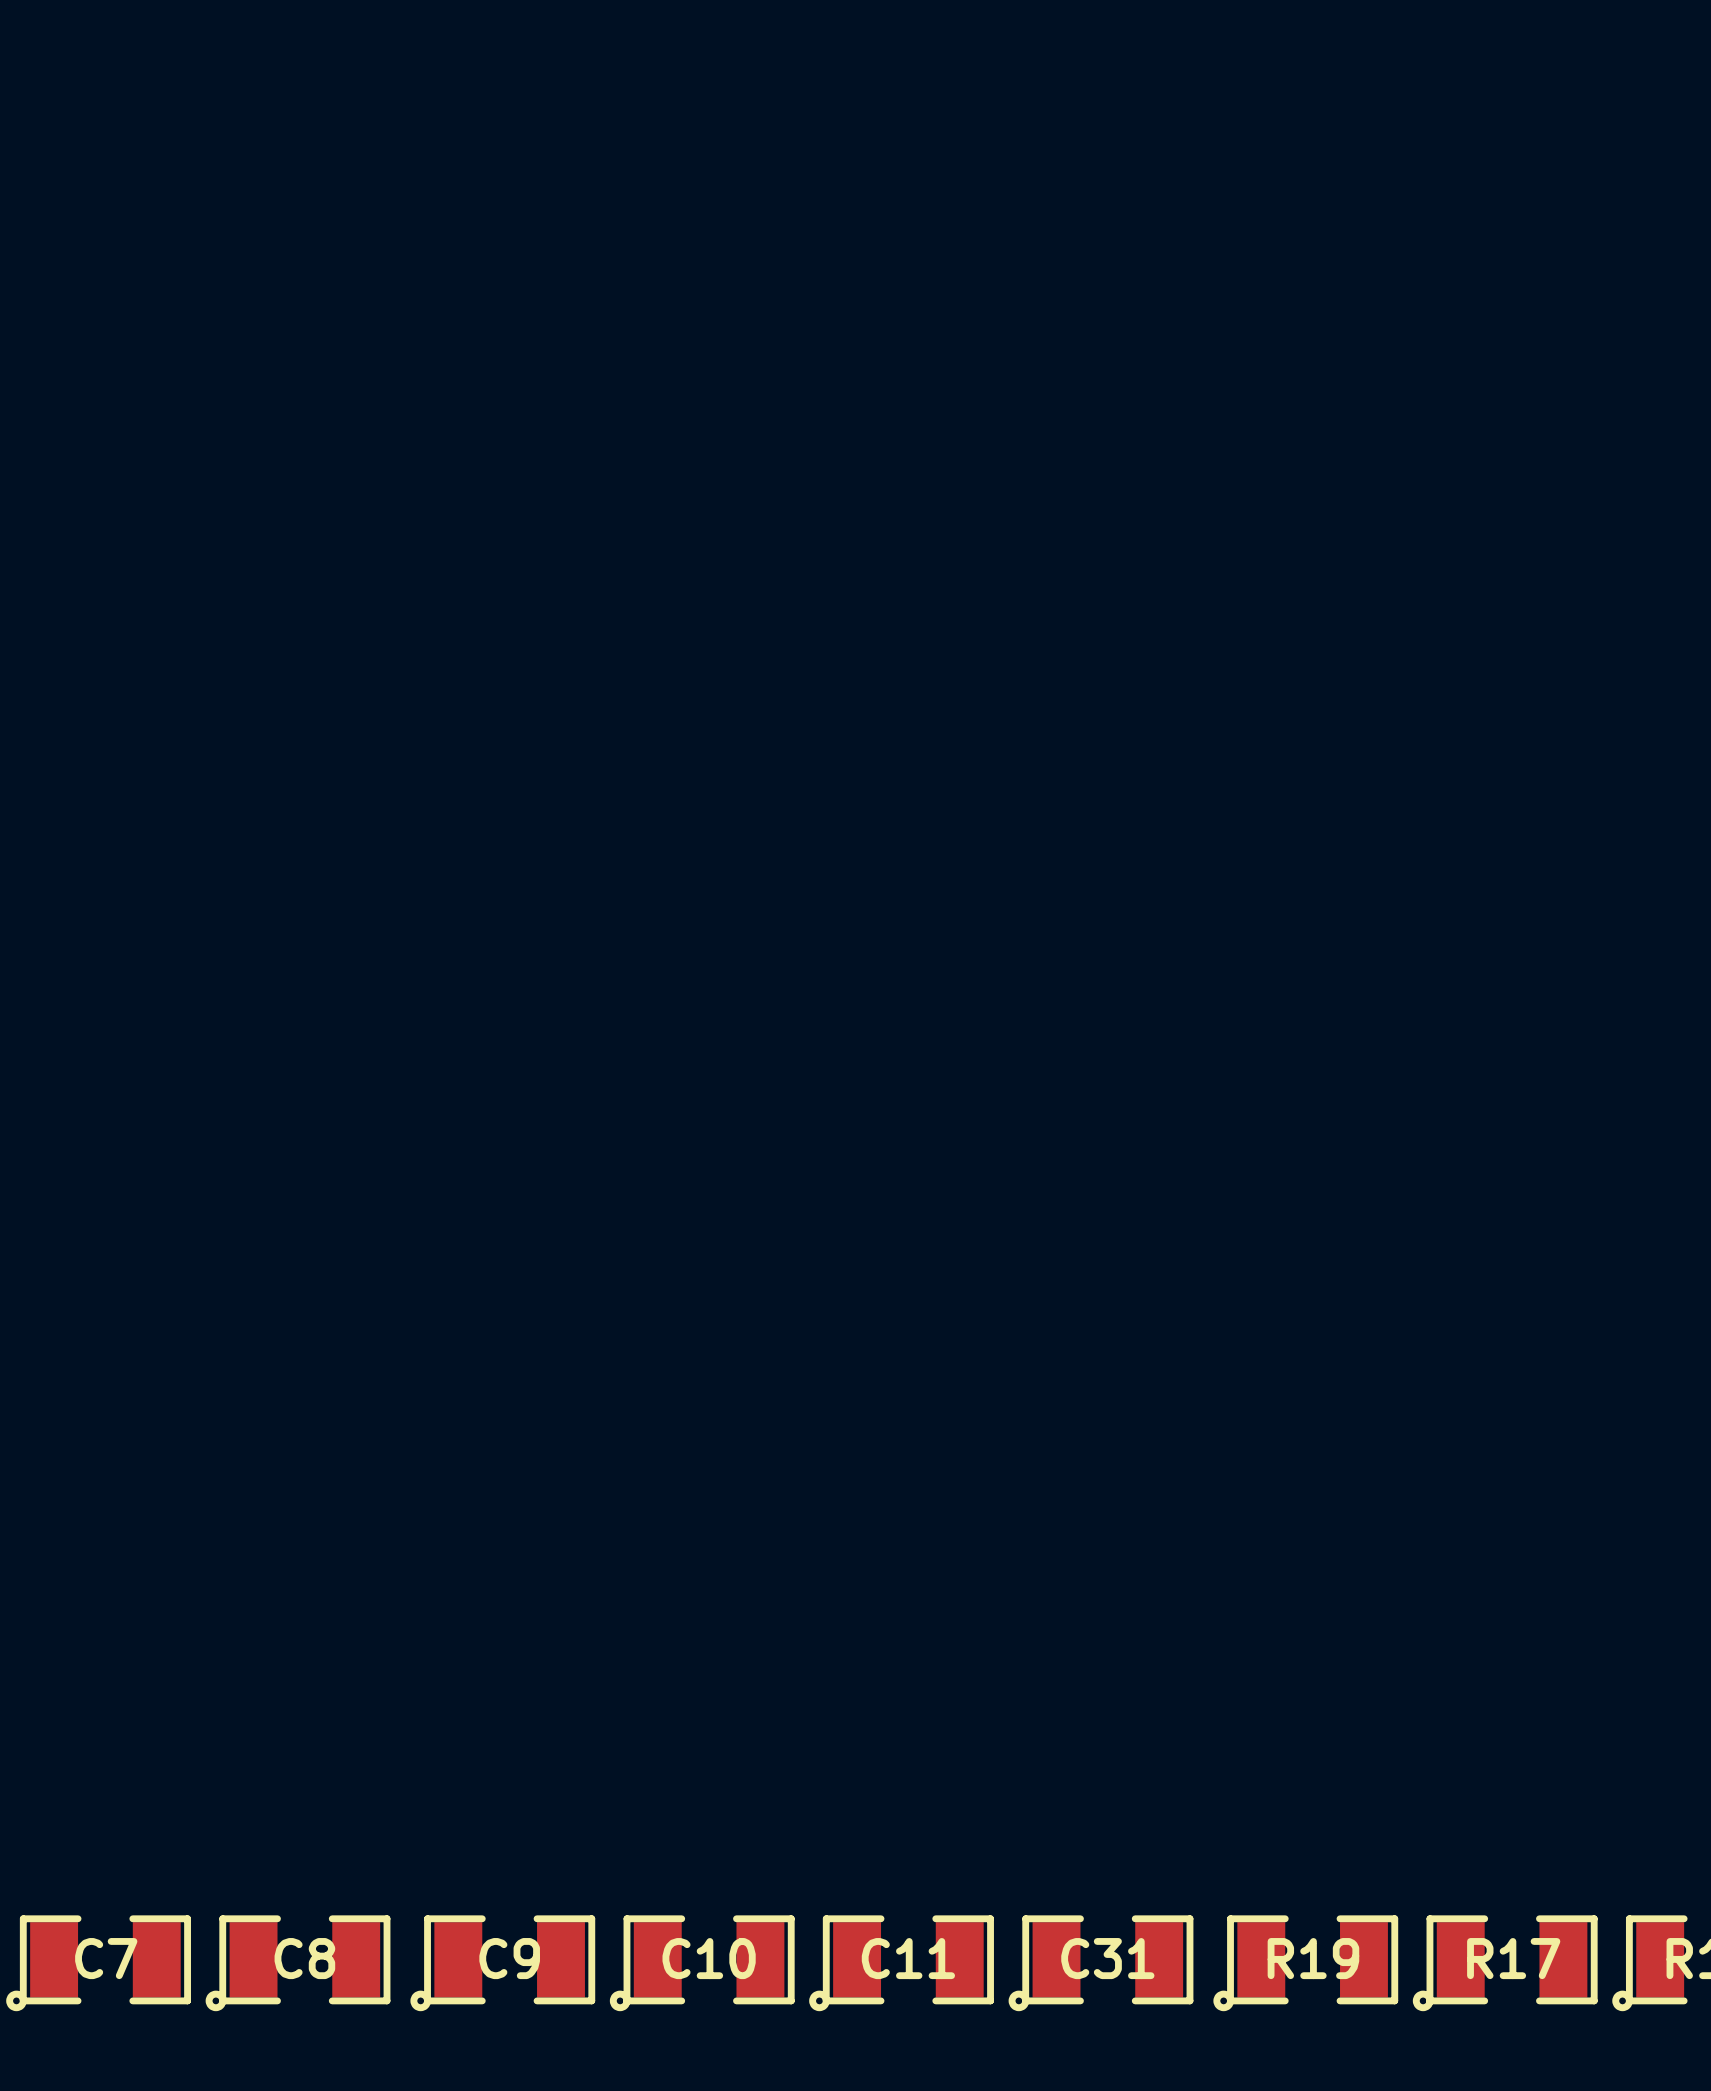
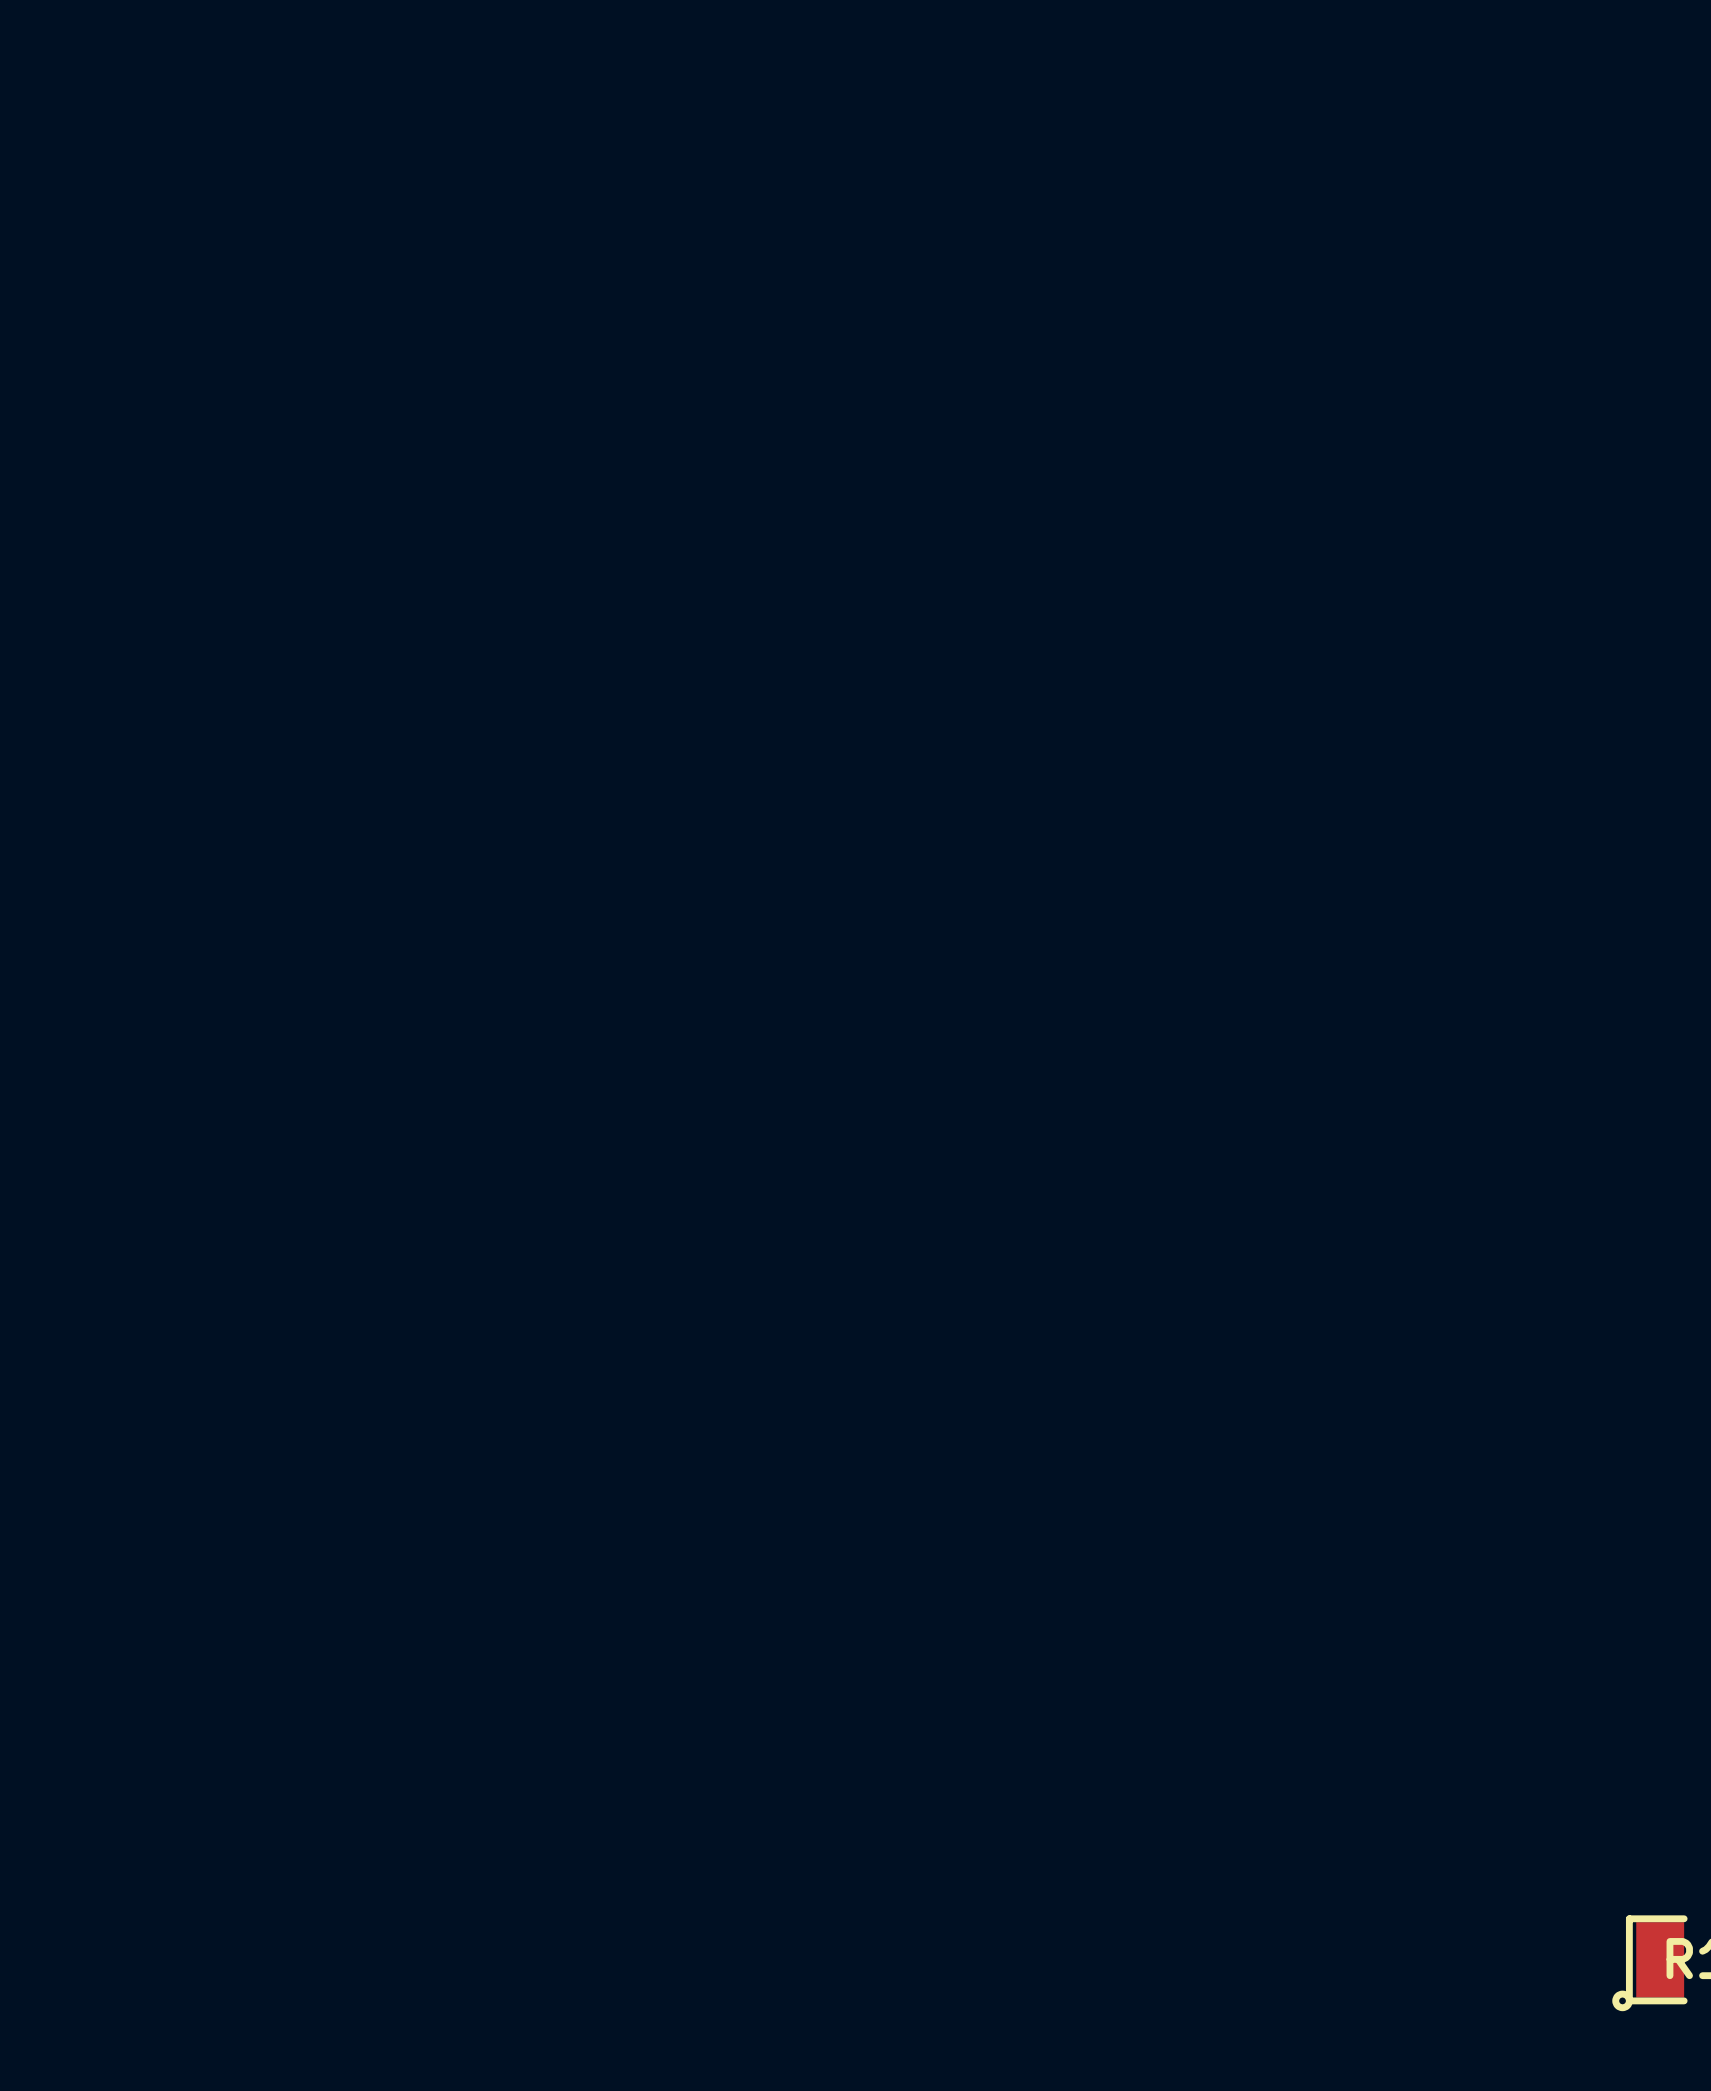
C7: (98, 1963) -> none
C8: (298, 1963) -> none
C9: (502, 1963) -> none
C10: (702, 1963) -> none
C11: (901, 1963) -> none
C31: (1101, 1963) -> none
R19: (1305, 1963) -> none
R17: (1505, 1963) -> none

